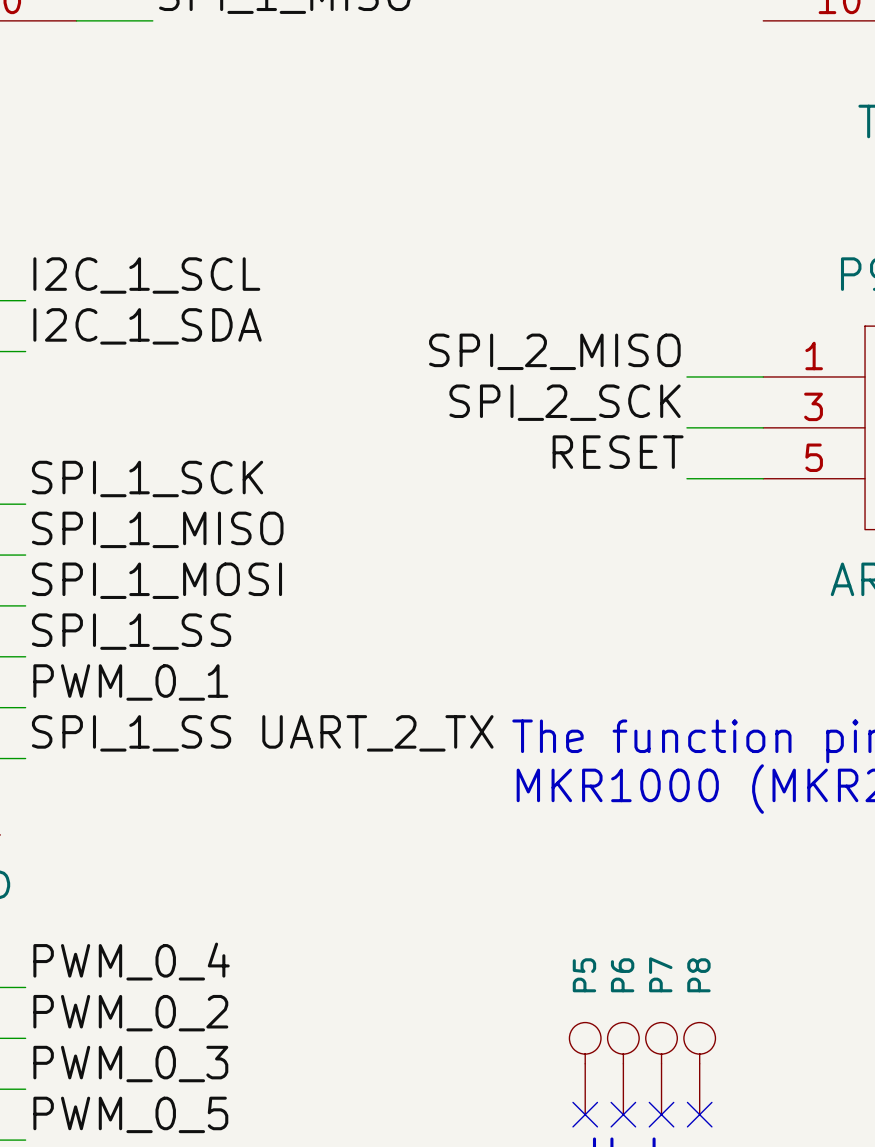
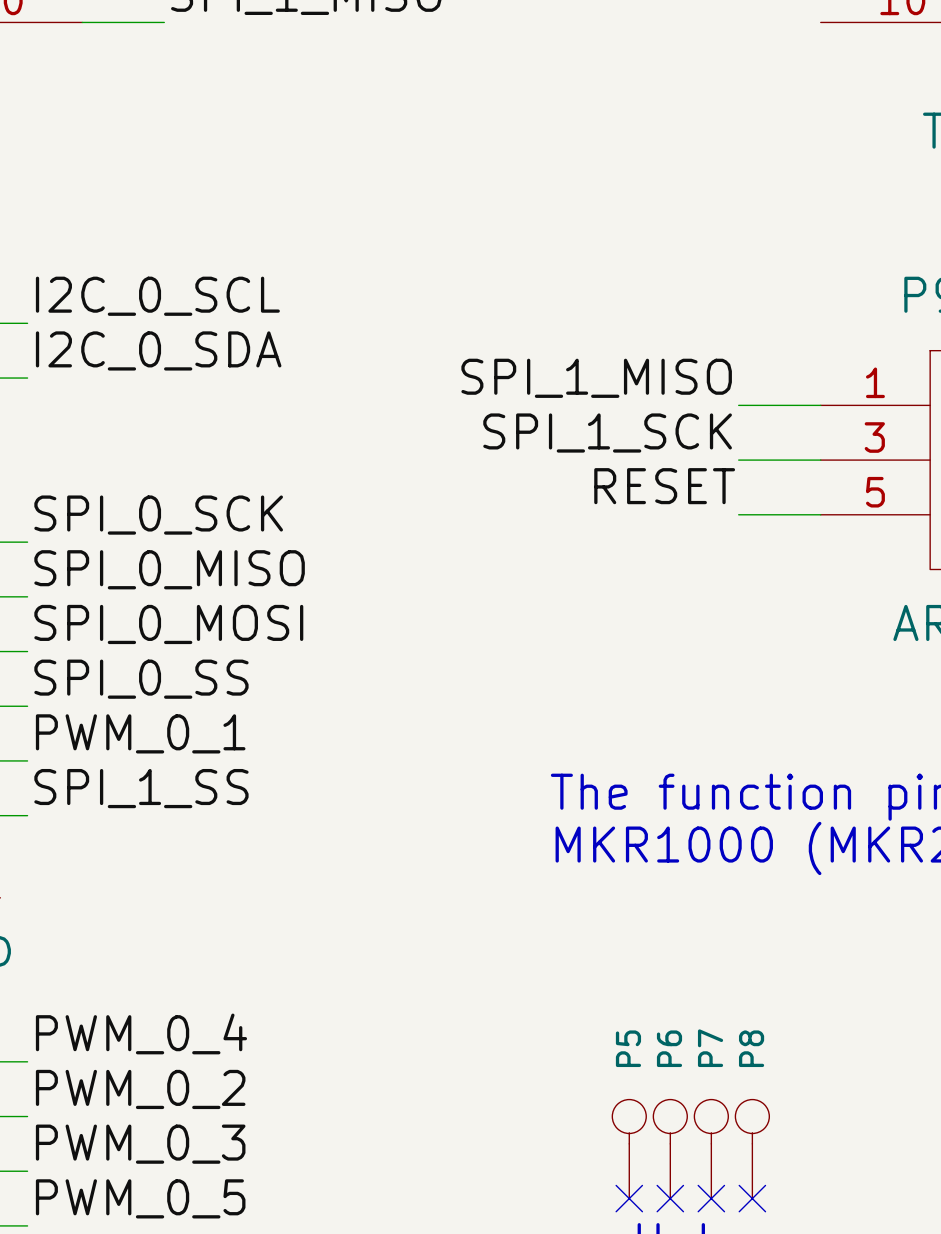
label: I2C_1_SCL (146, 275) -> I2C_0_SCL (157, 296)
label: I2C_1_SDA (147, 326) -> I2C_0_SDA (158, 350)
label: SPI_2_MISO (554, 351) -> SPI_1_MISO (596, 378)
label: SPI_2_SCK (565, 402) -> SPI_1_SCK (607, 433)
label: SPI_1_SCK (147, 478) -> SPI_0_SCK (158, 515)
label: SPI_1_MISO (157, 529) -> SPI_0_MISO (169, 569)
label: SPI_1_MOSI (156, 580) -> SPI_0_MOSI (168, 624)
label: SPI_1_SS (131, 631) -> SPI_0_SS (141, 679)
label: UART_2_TX (377, 733) -> none

